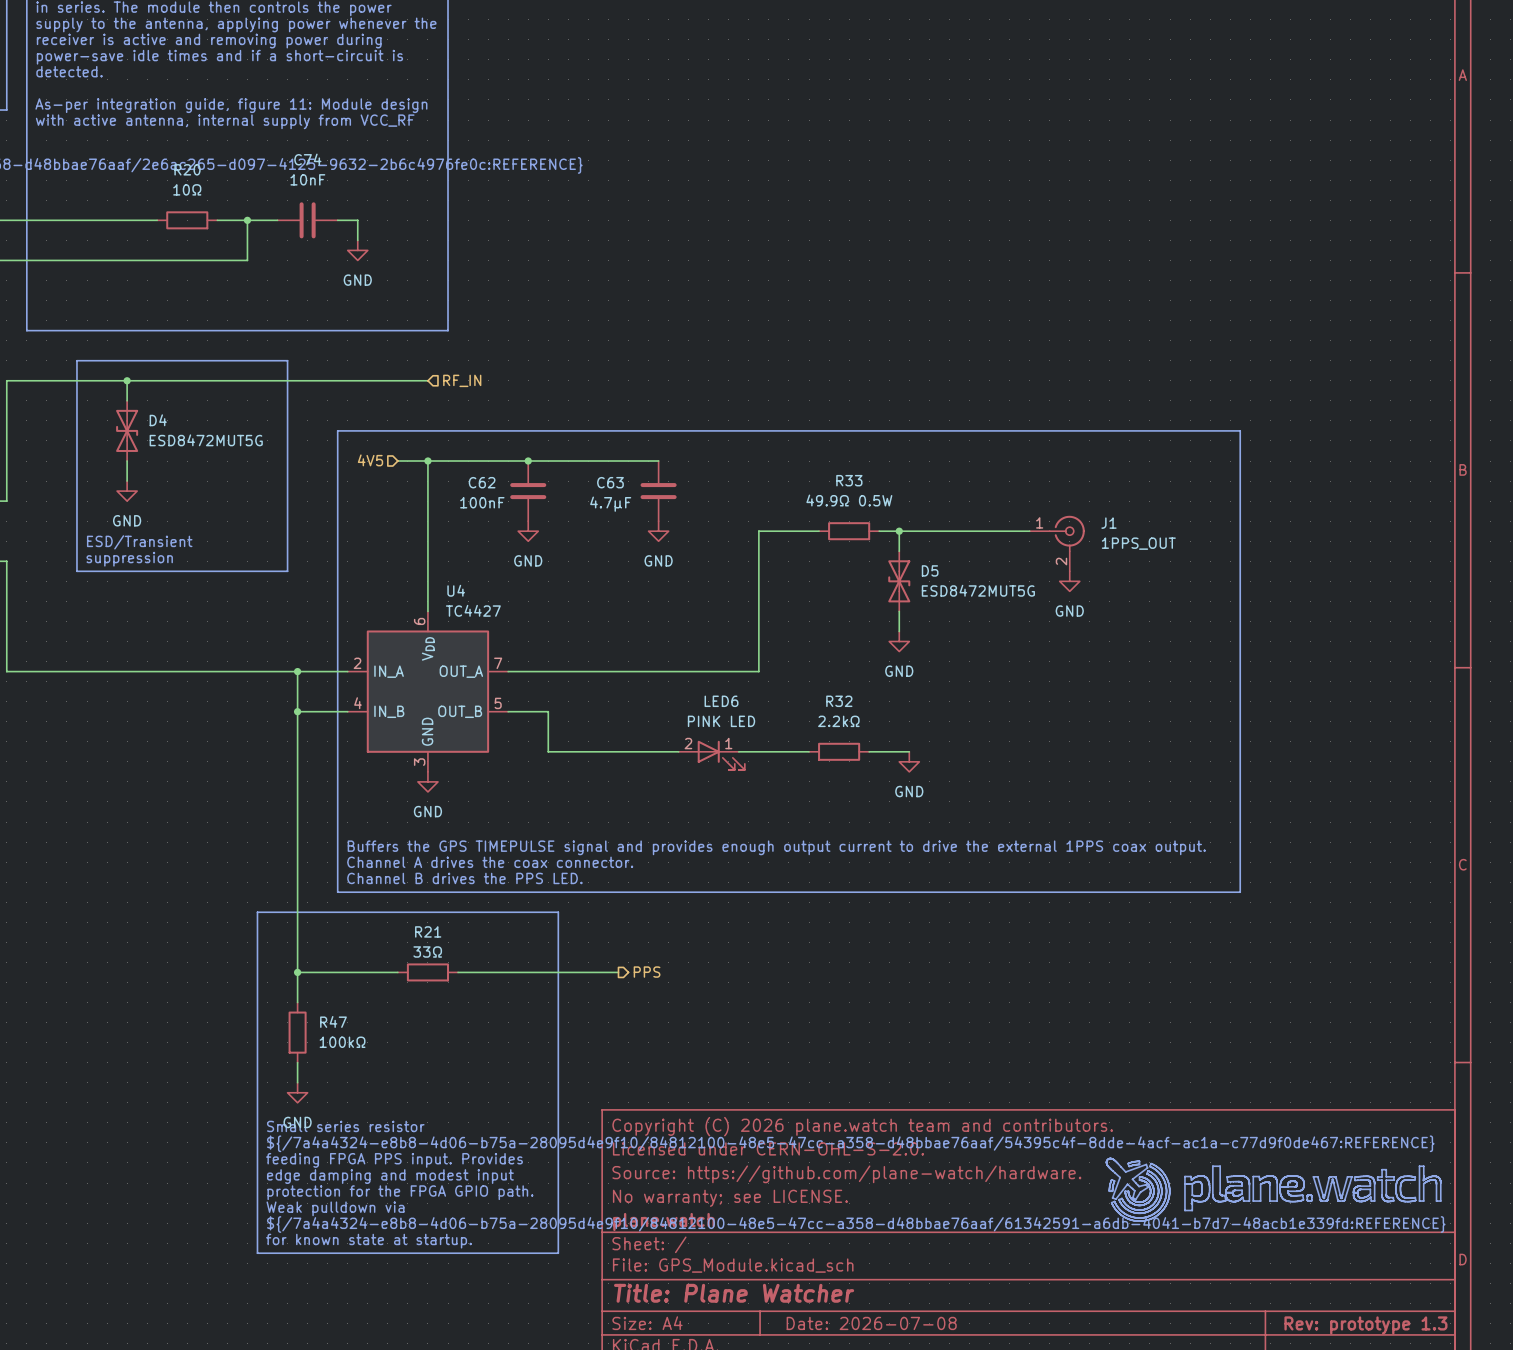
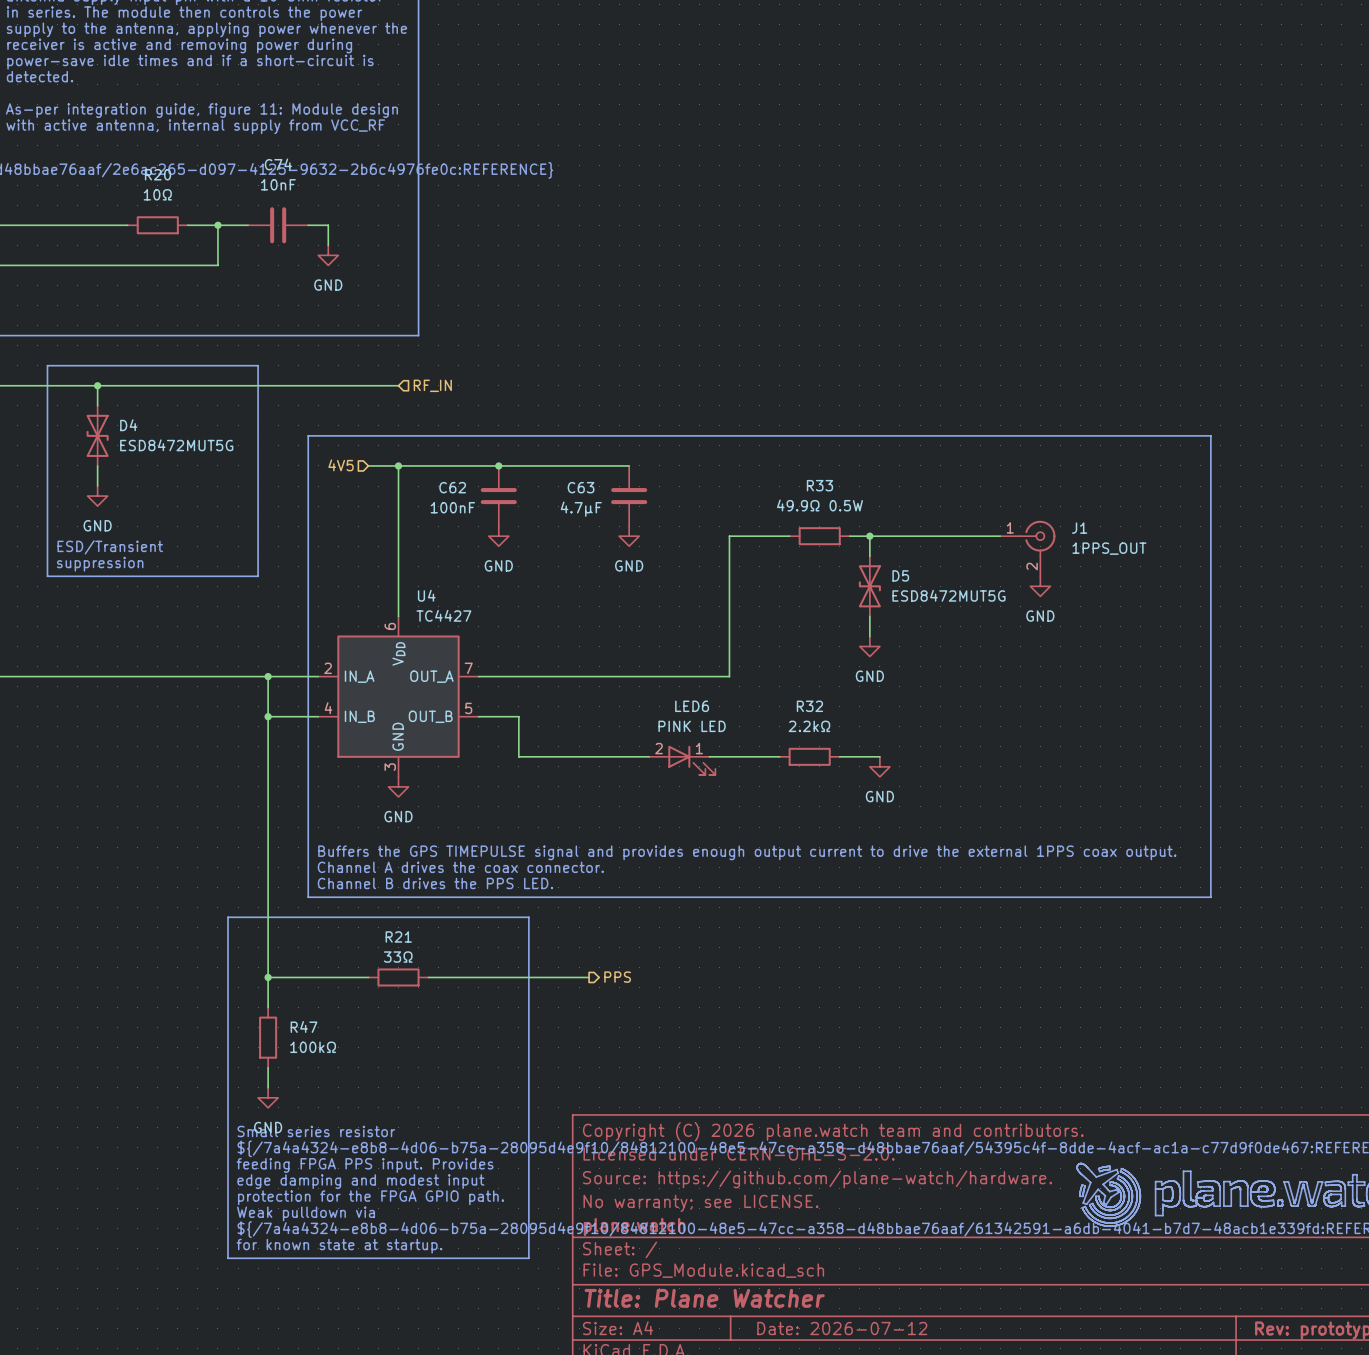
title block: Date: 2026-07-08 (871, 1323) -> Date: 2026-07-12 (842, 1328)

